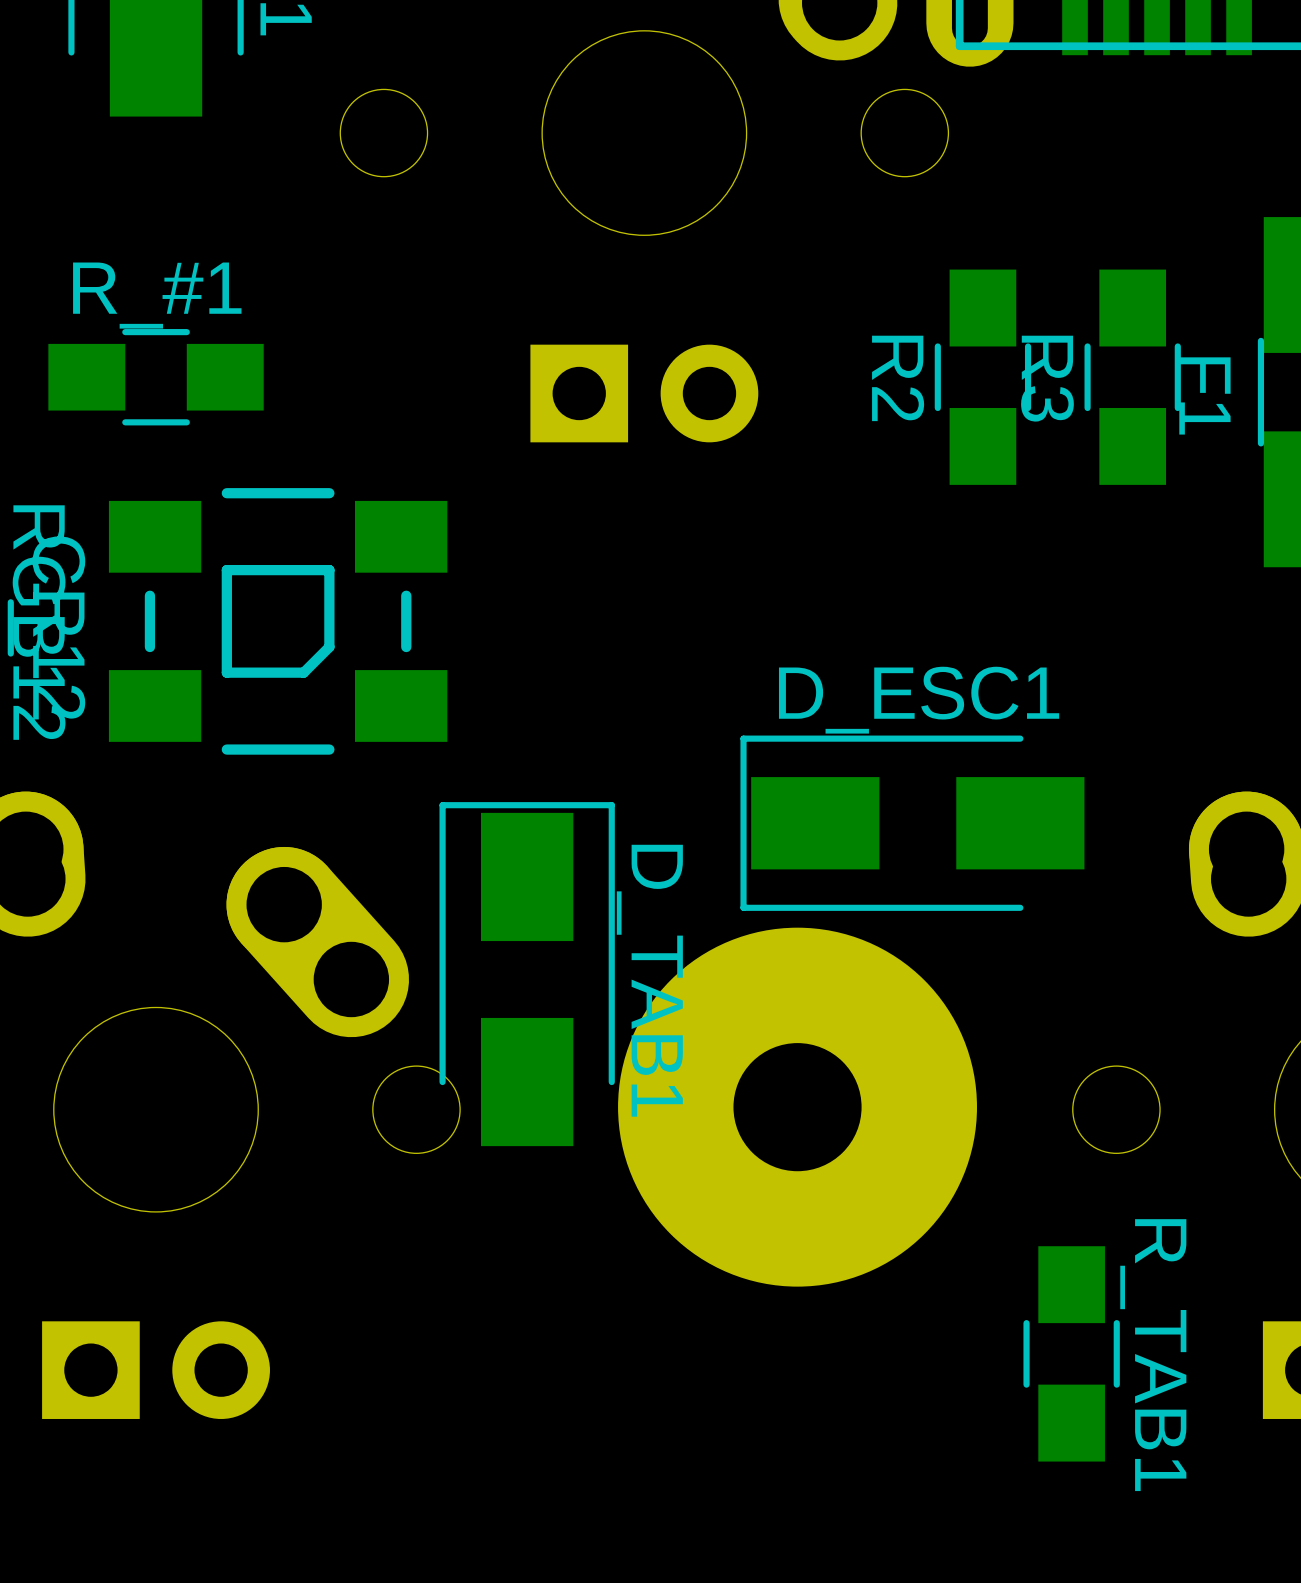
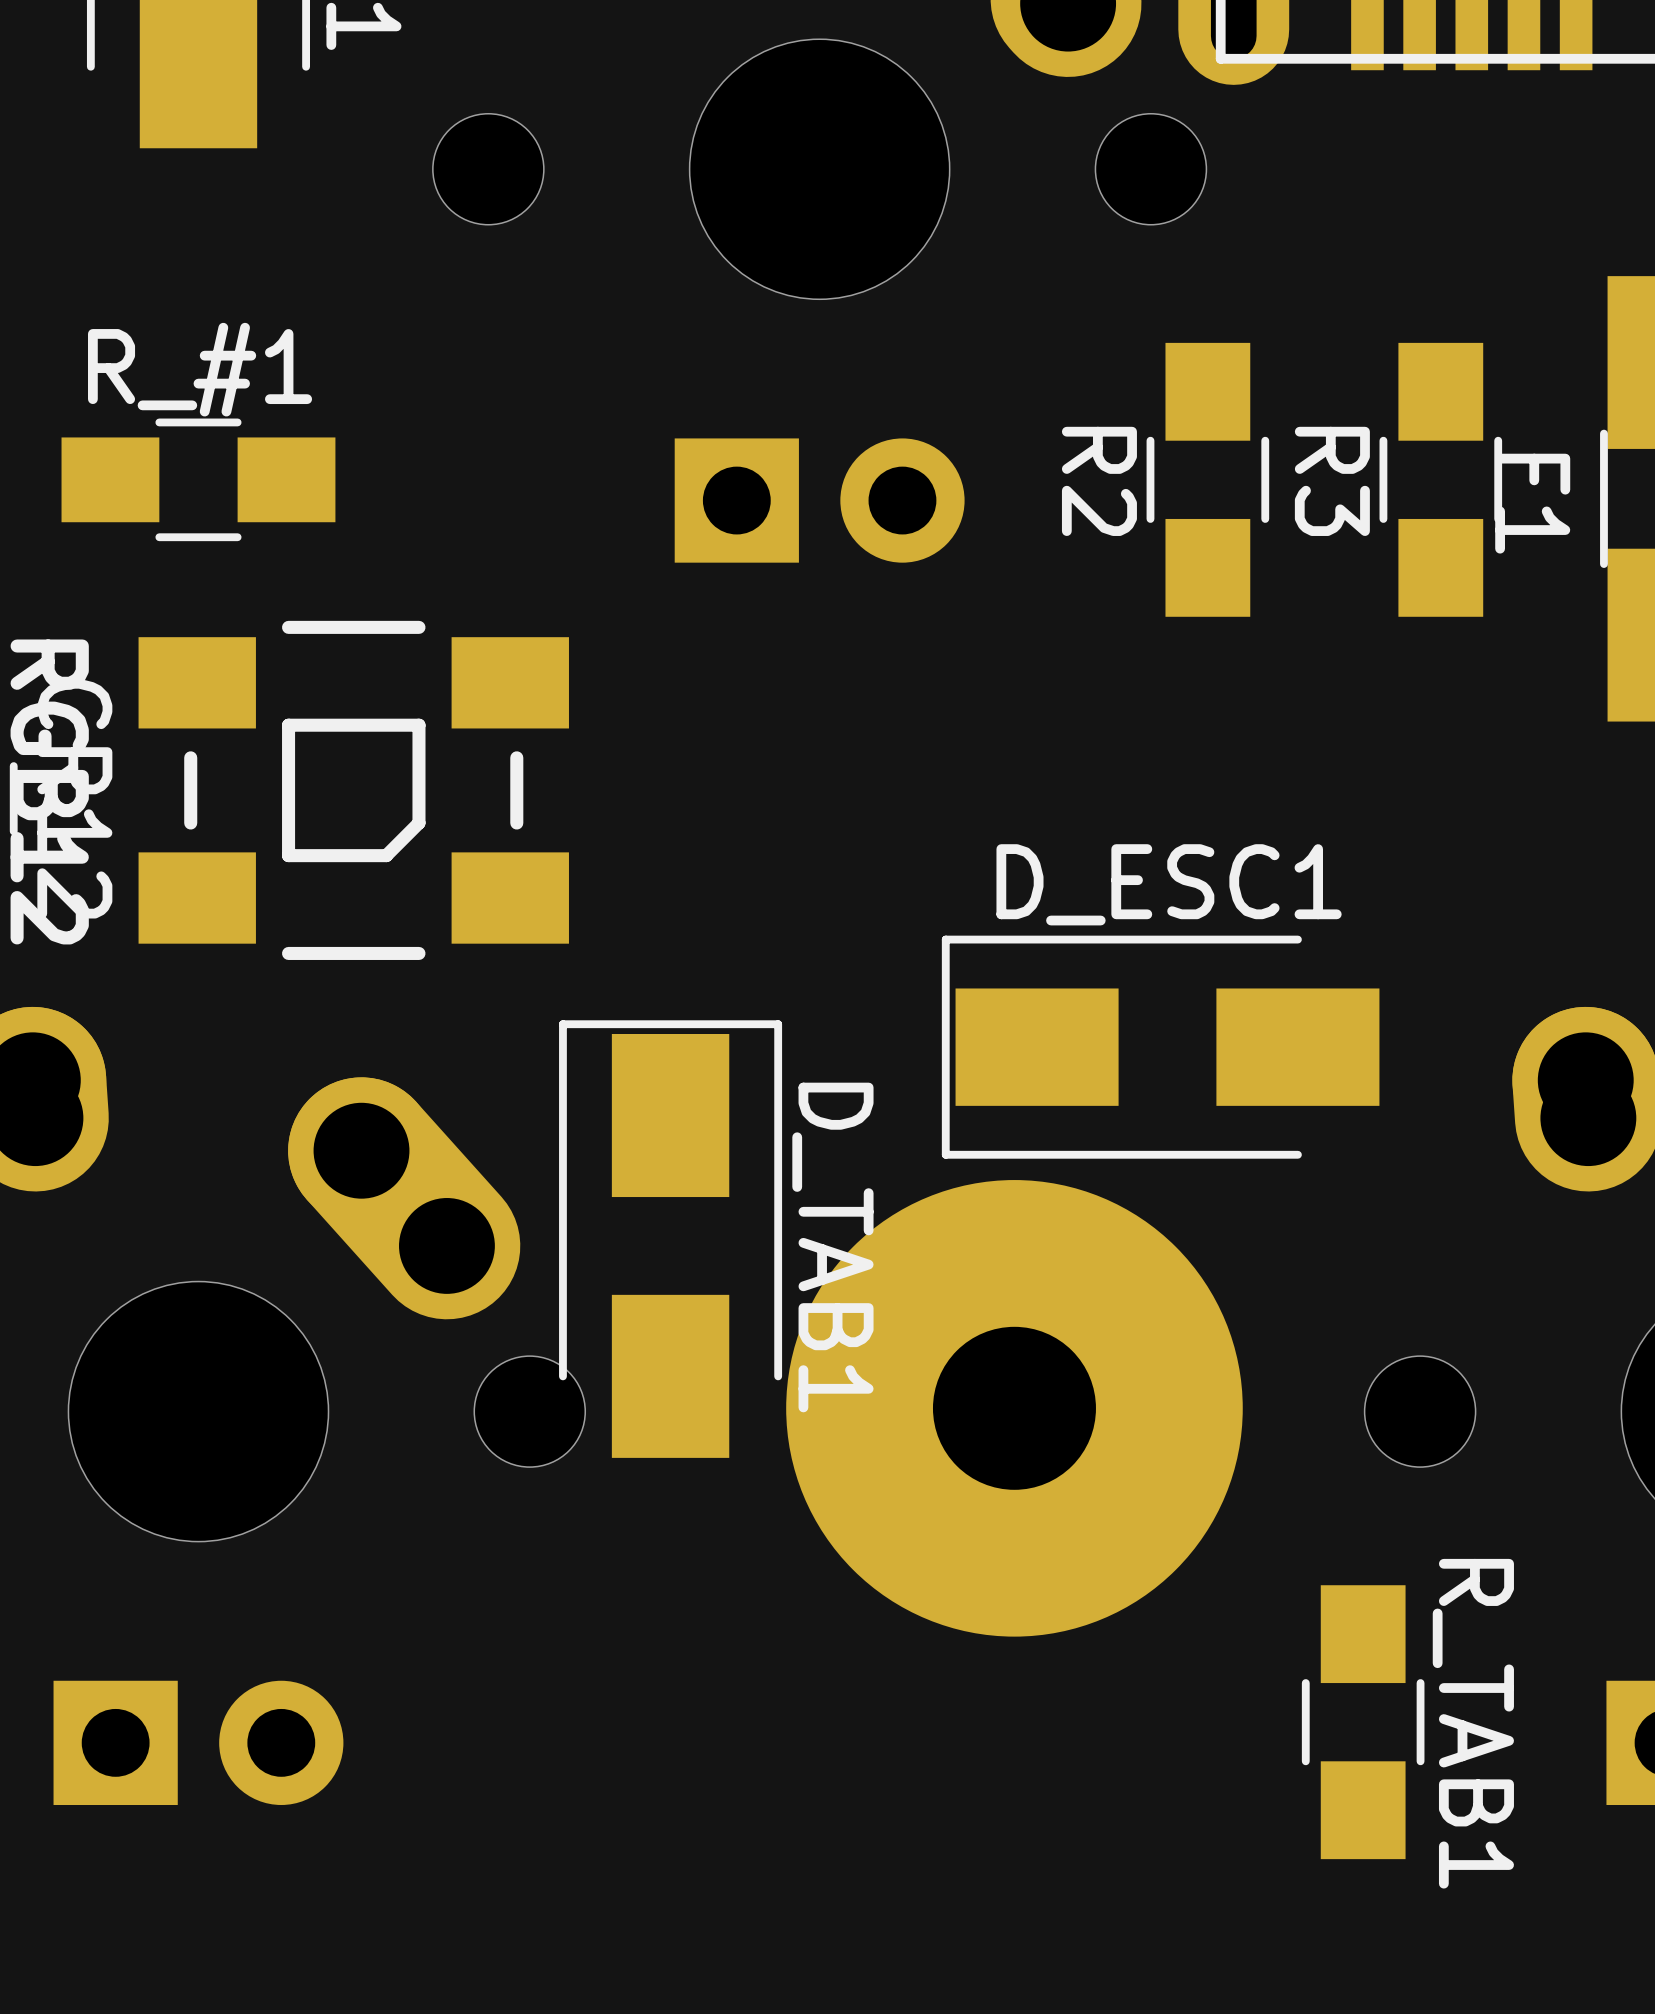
R2 position: (982, 377) -> (1207, 479)

